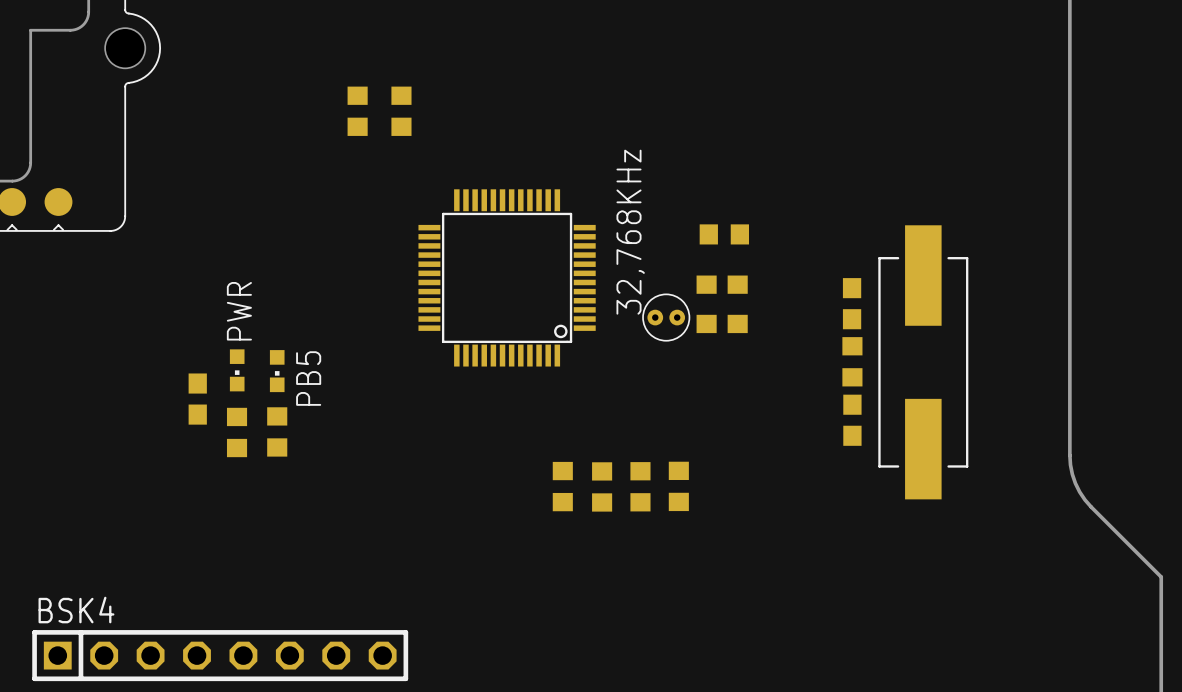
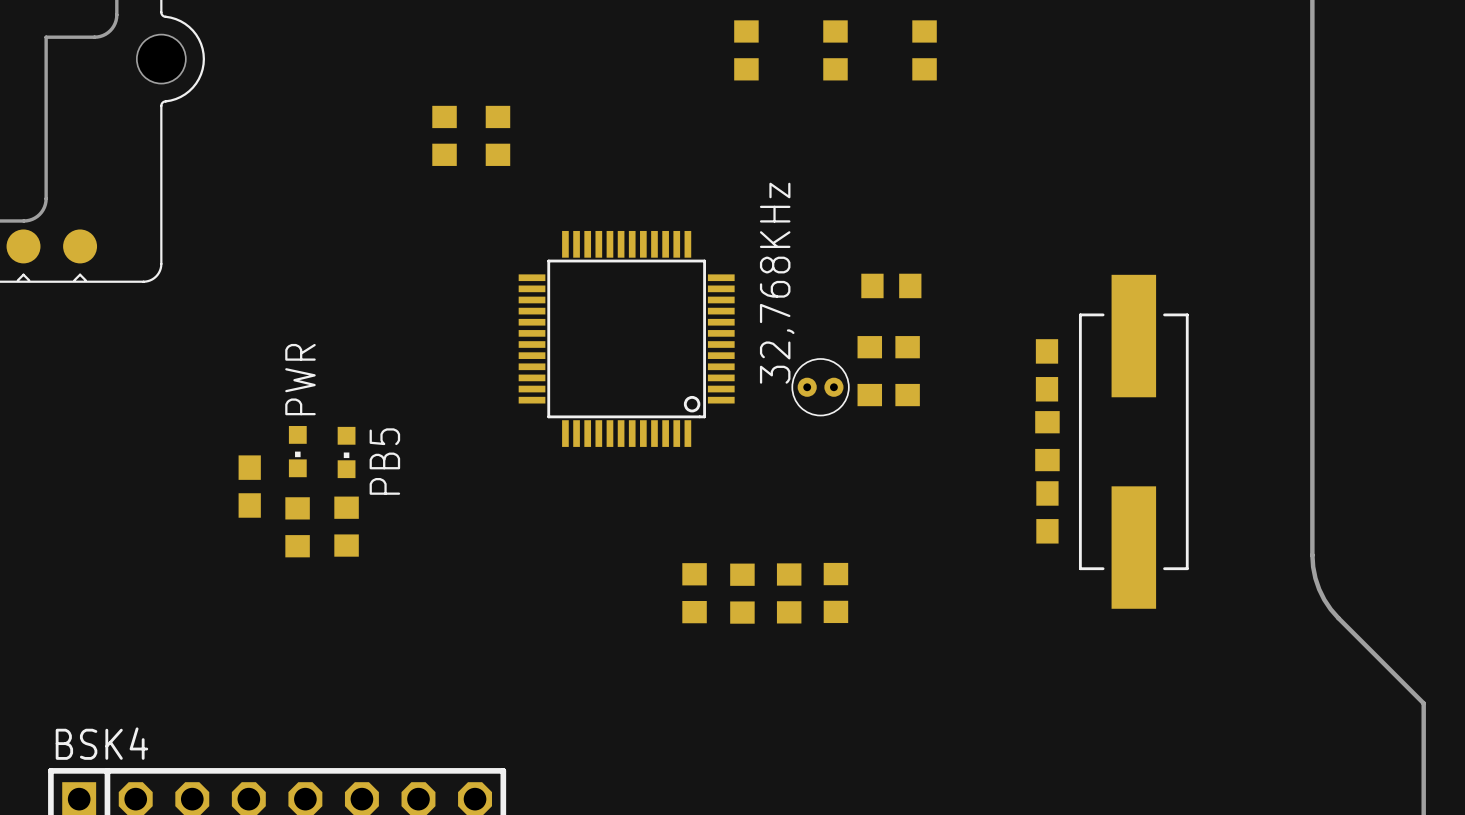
part: none -> (746, 50)
part: none -> (835, 50)
part: none -> (924, 50)

